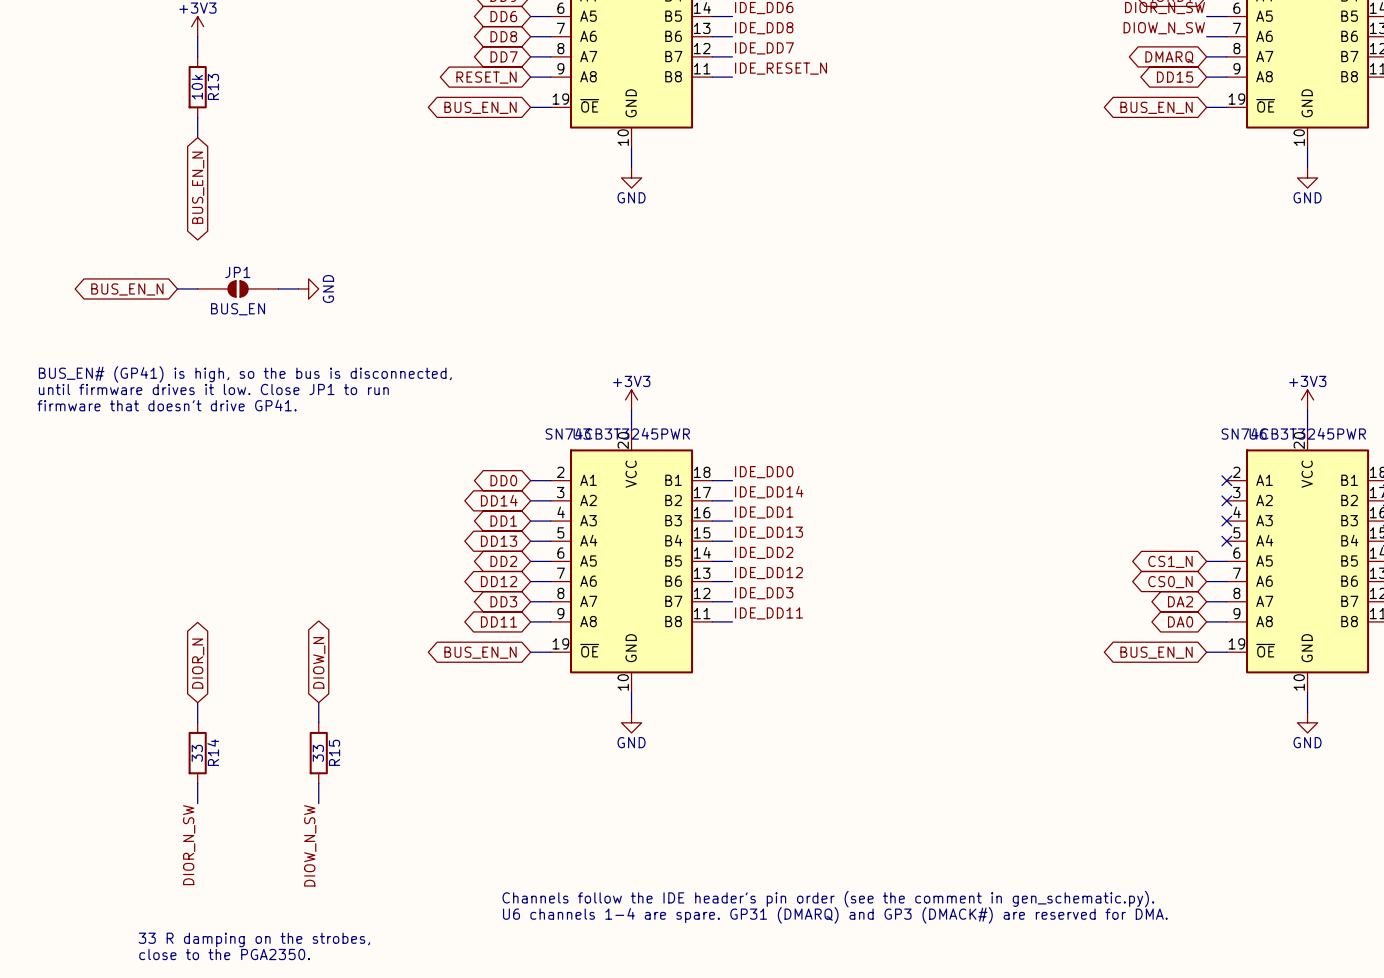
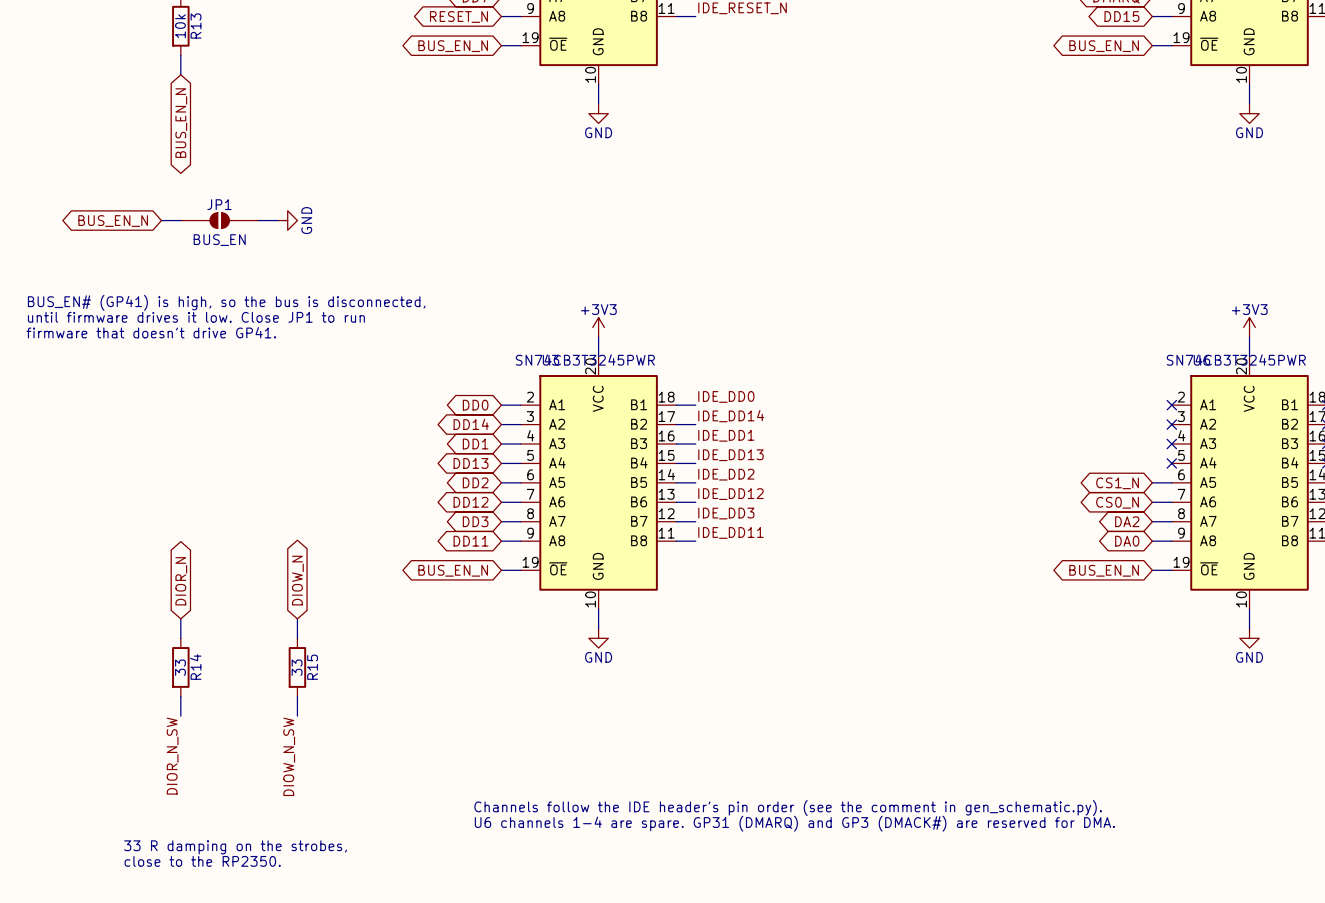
text: close to the PGA2350. (224, 954) -> close to the RP2350. (202, 861)

